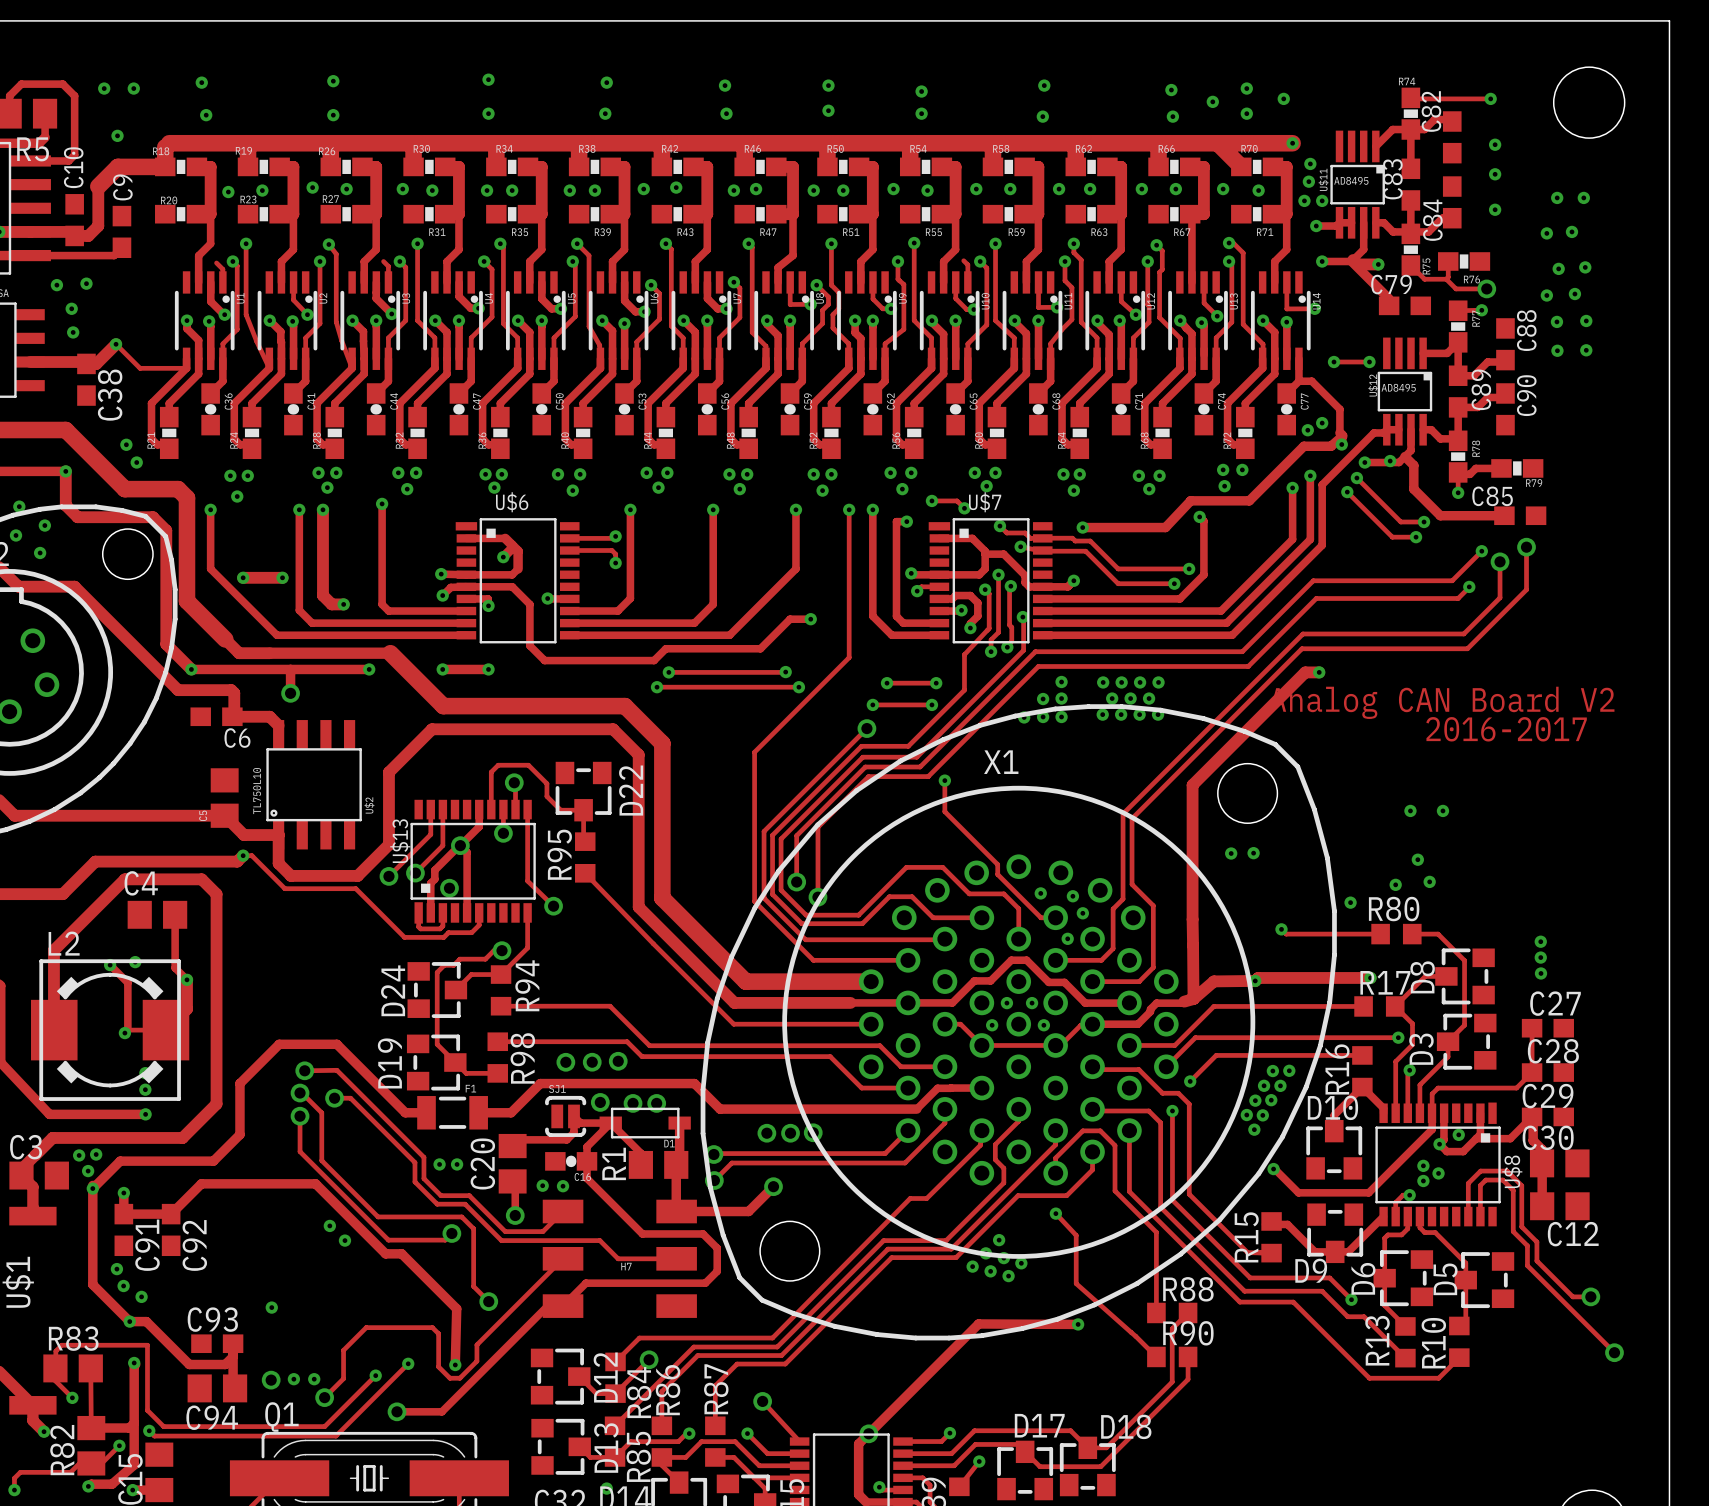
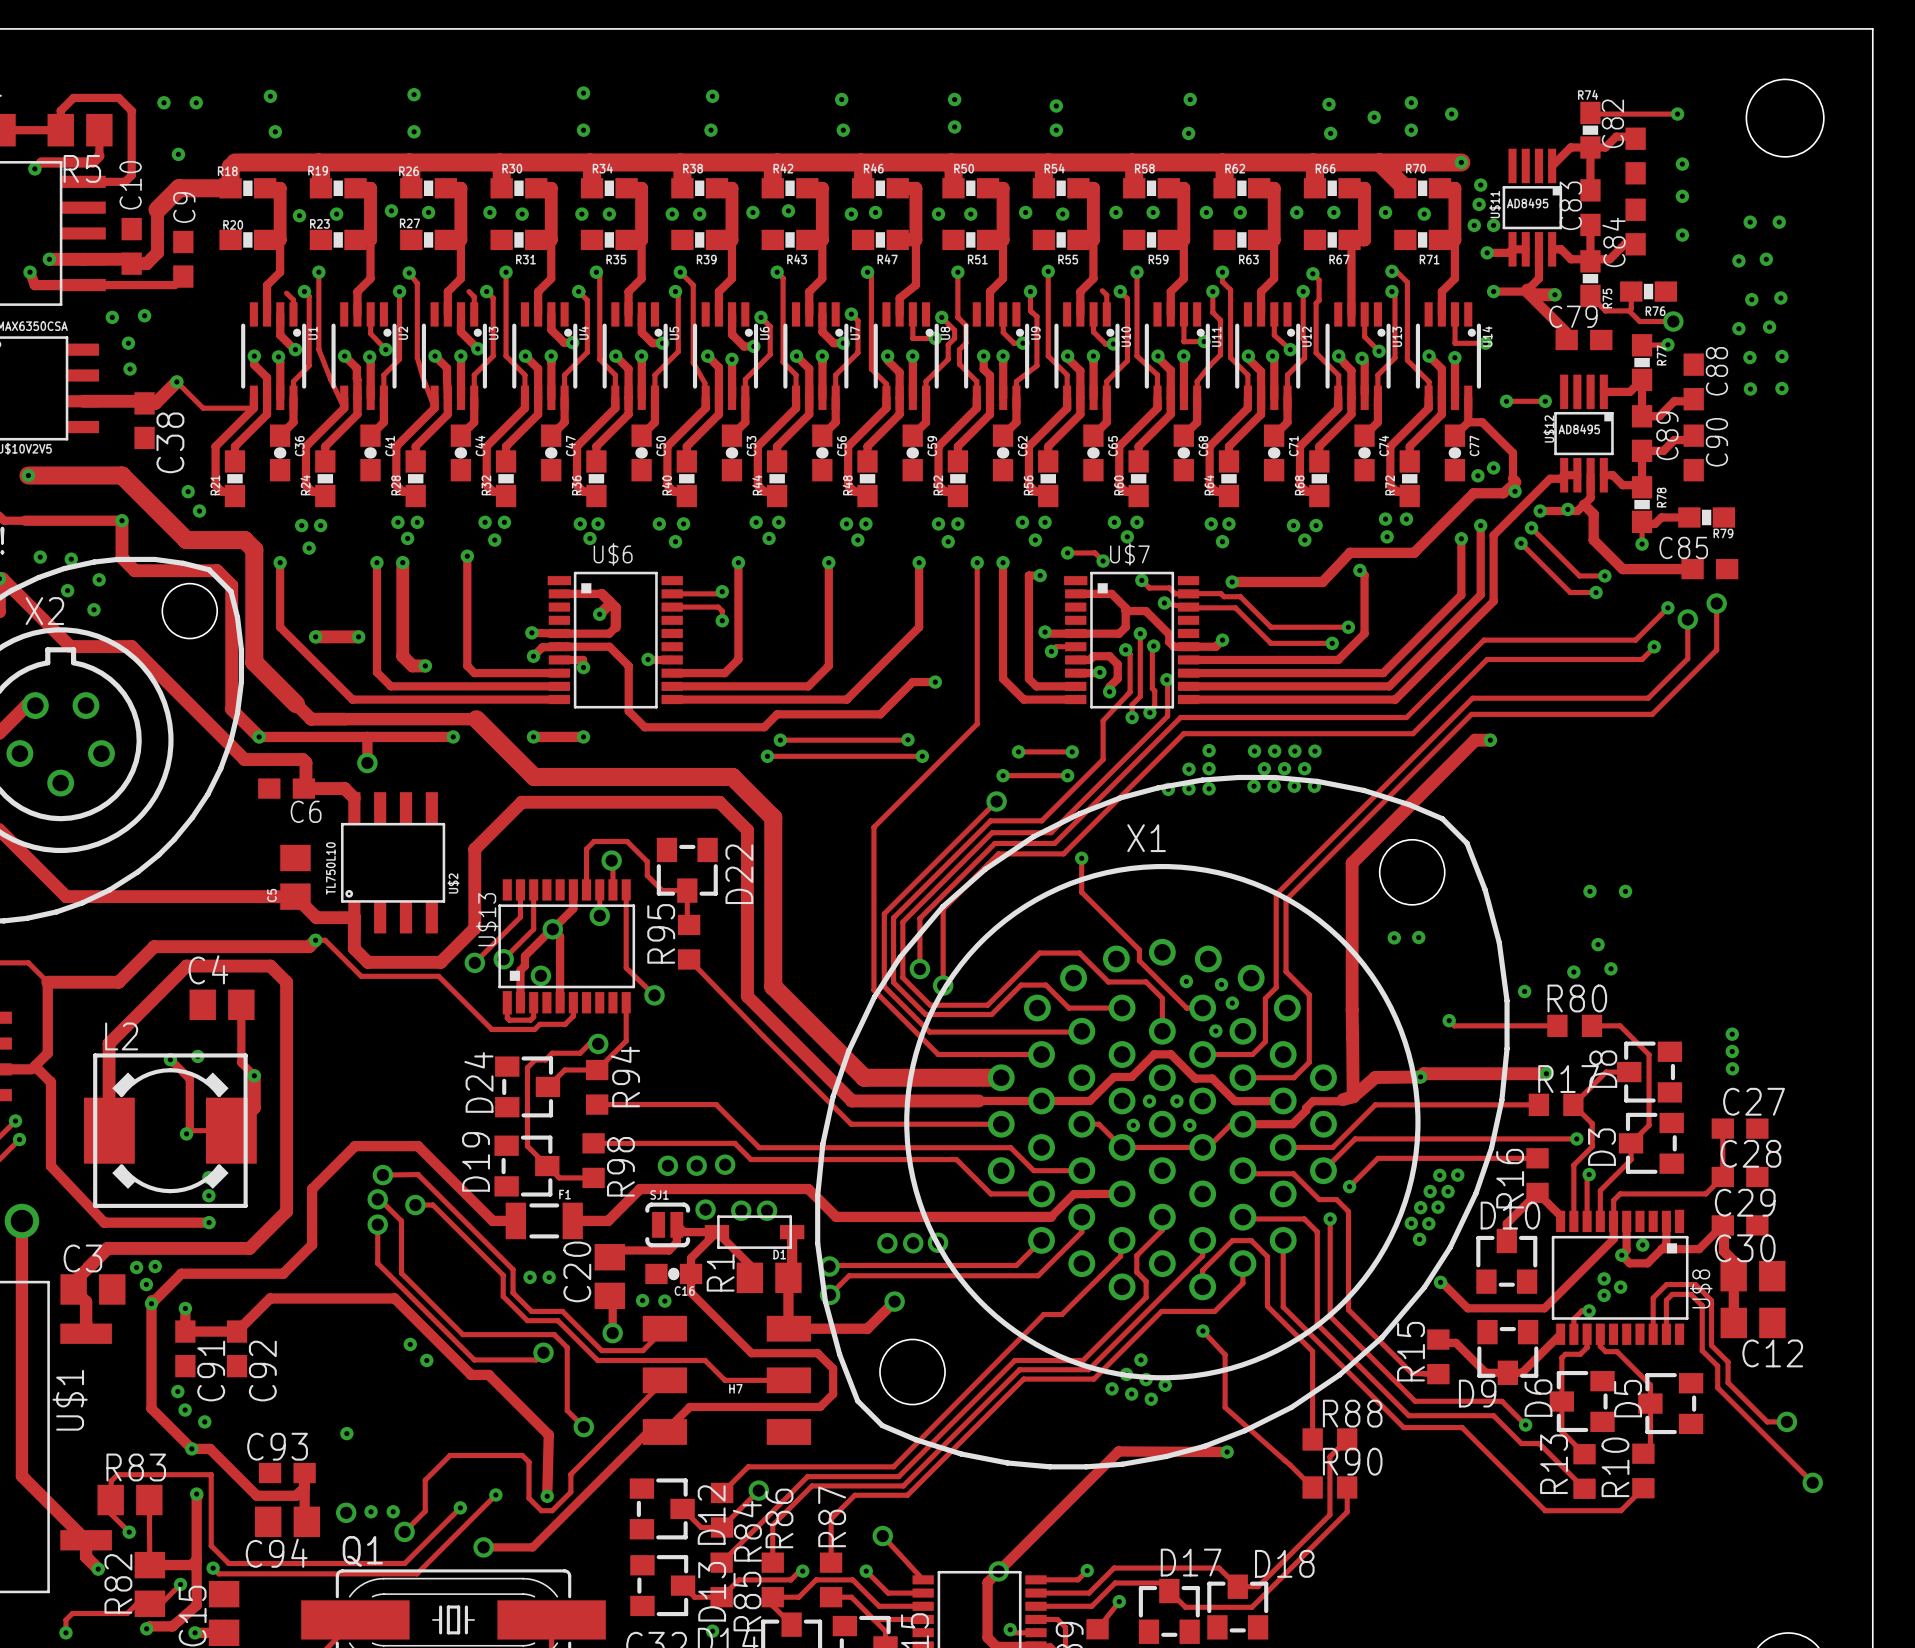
text: Analog CAN Board V2 (1442, 702) -> none
text: 2016-2017 (1506, 729) -> none

